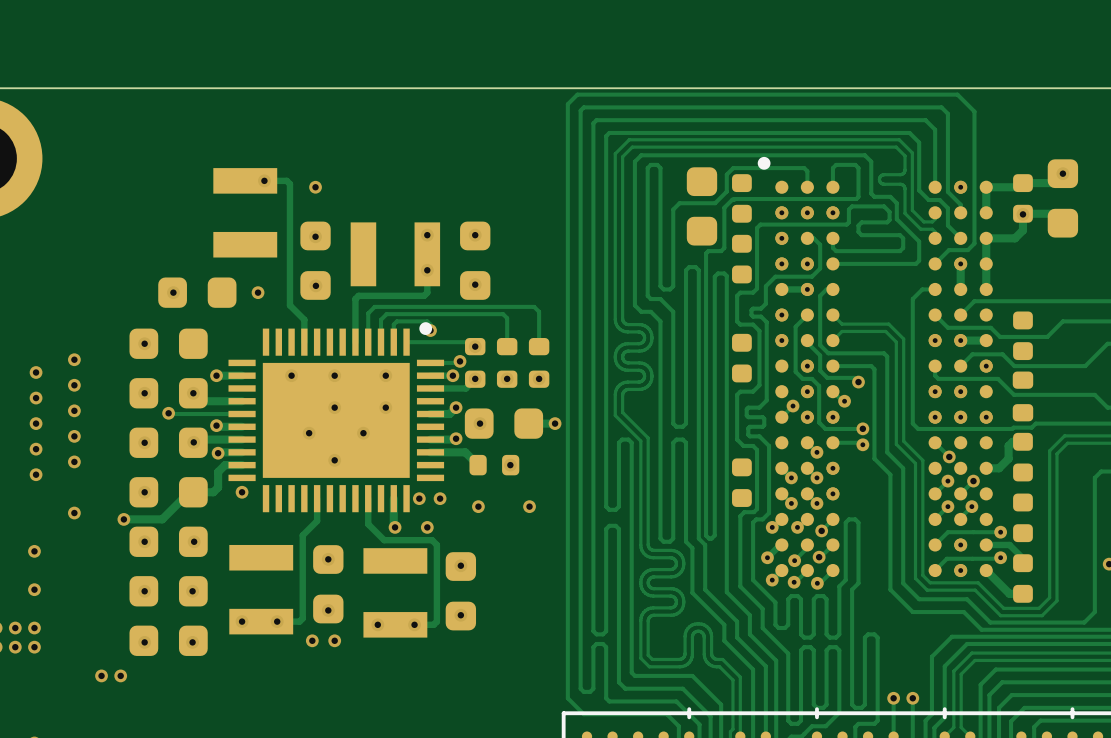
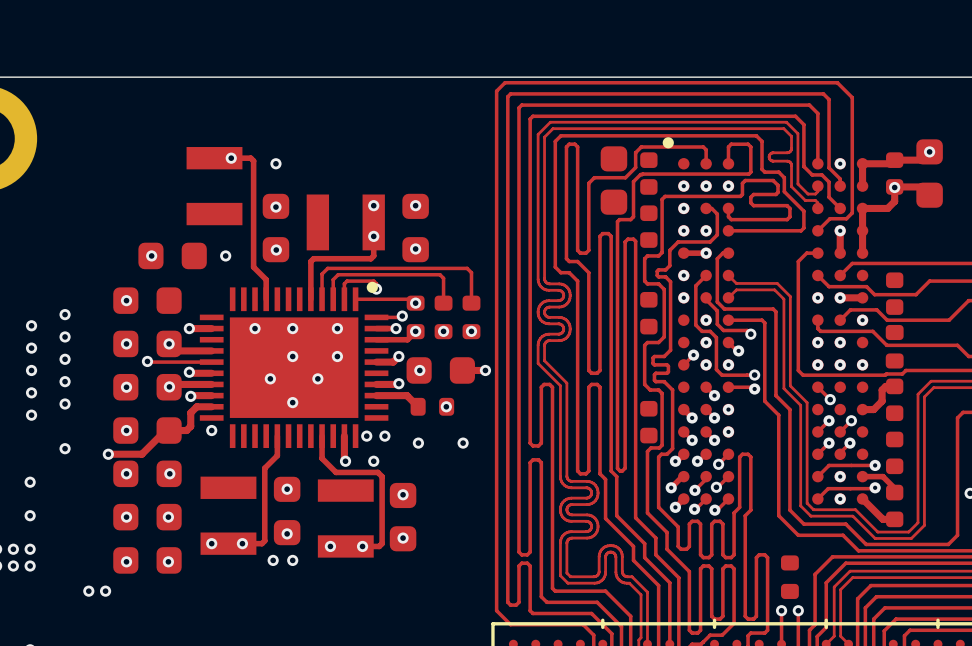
part: none -> (789, 577)

